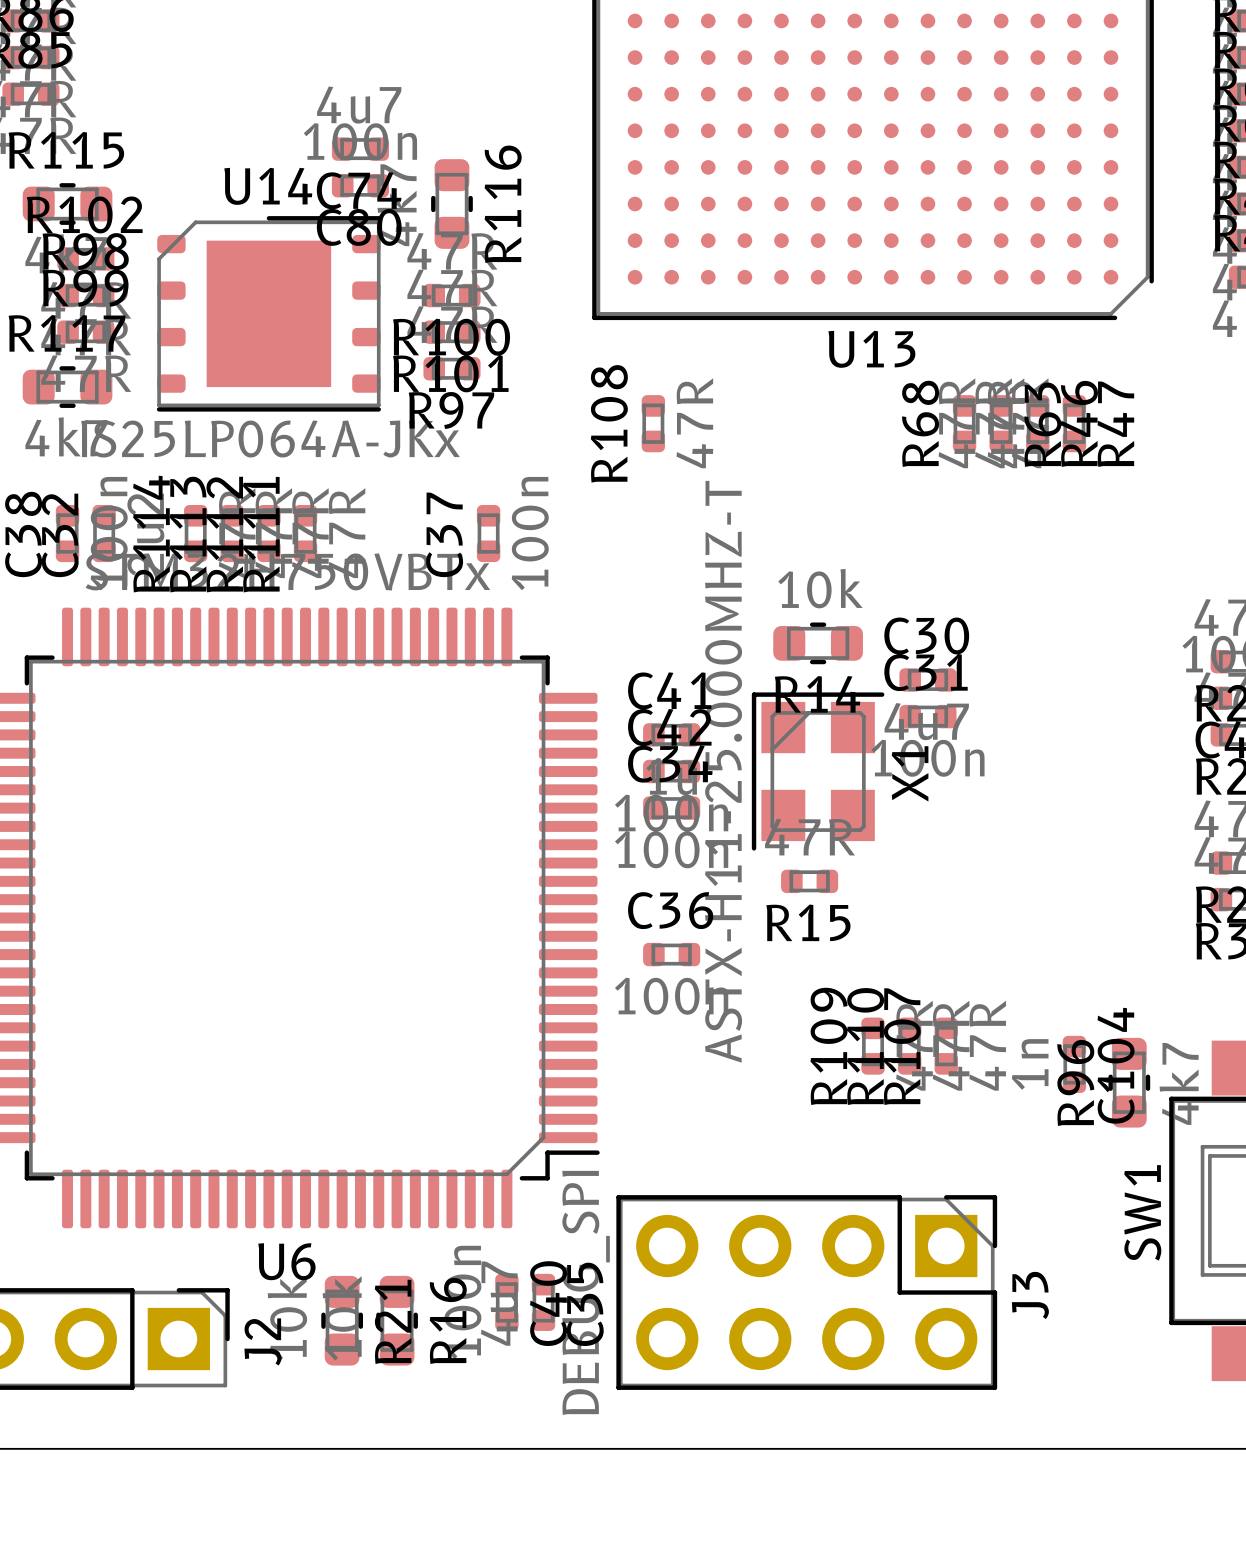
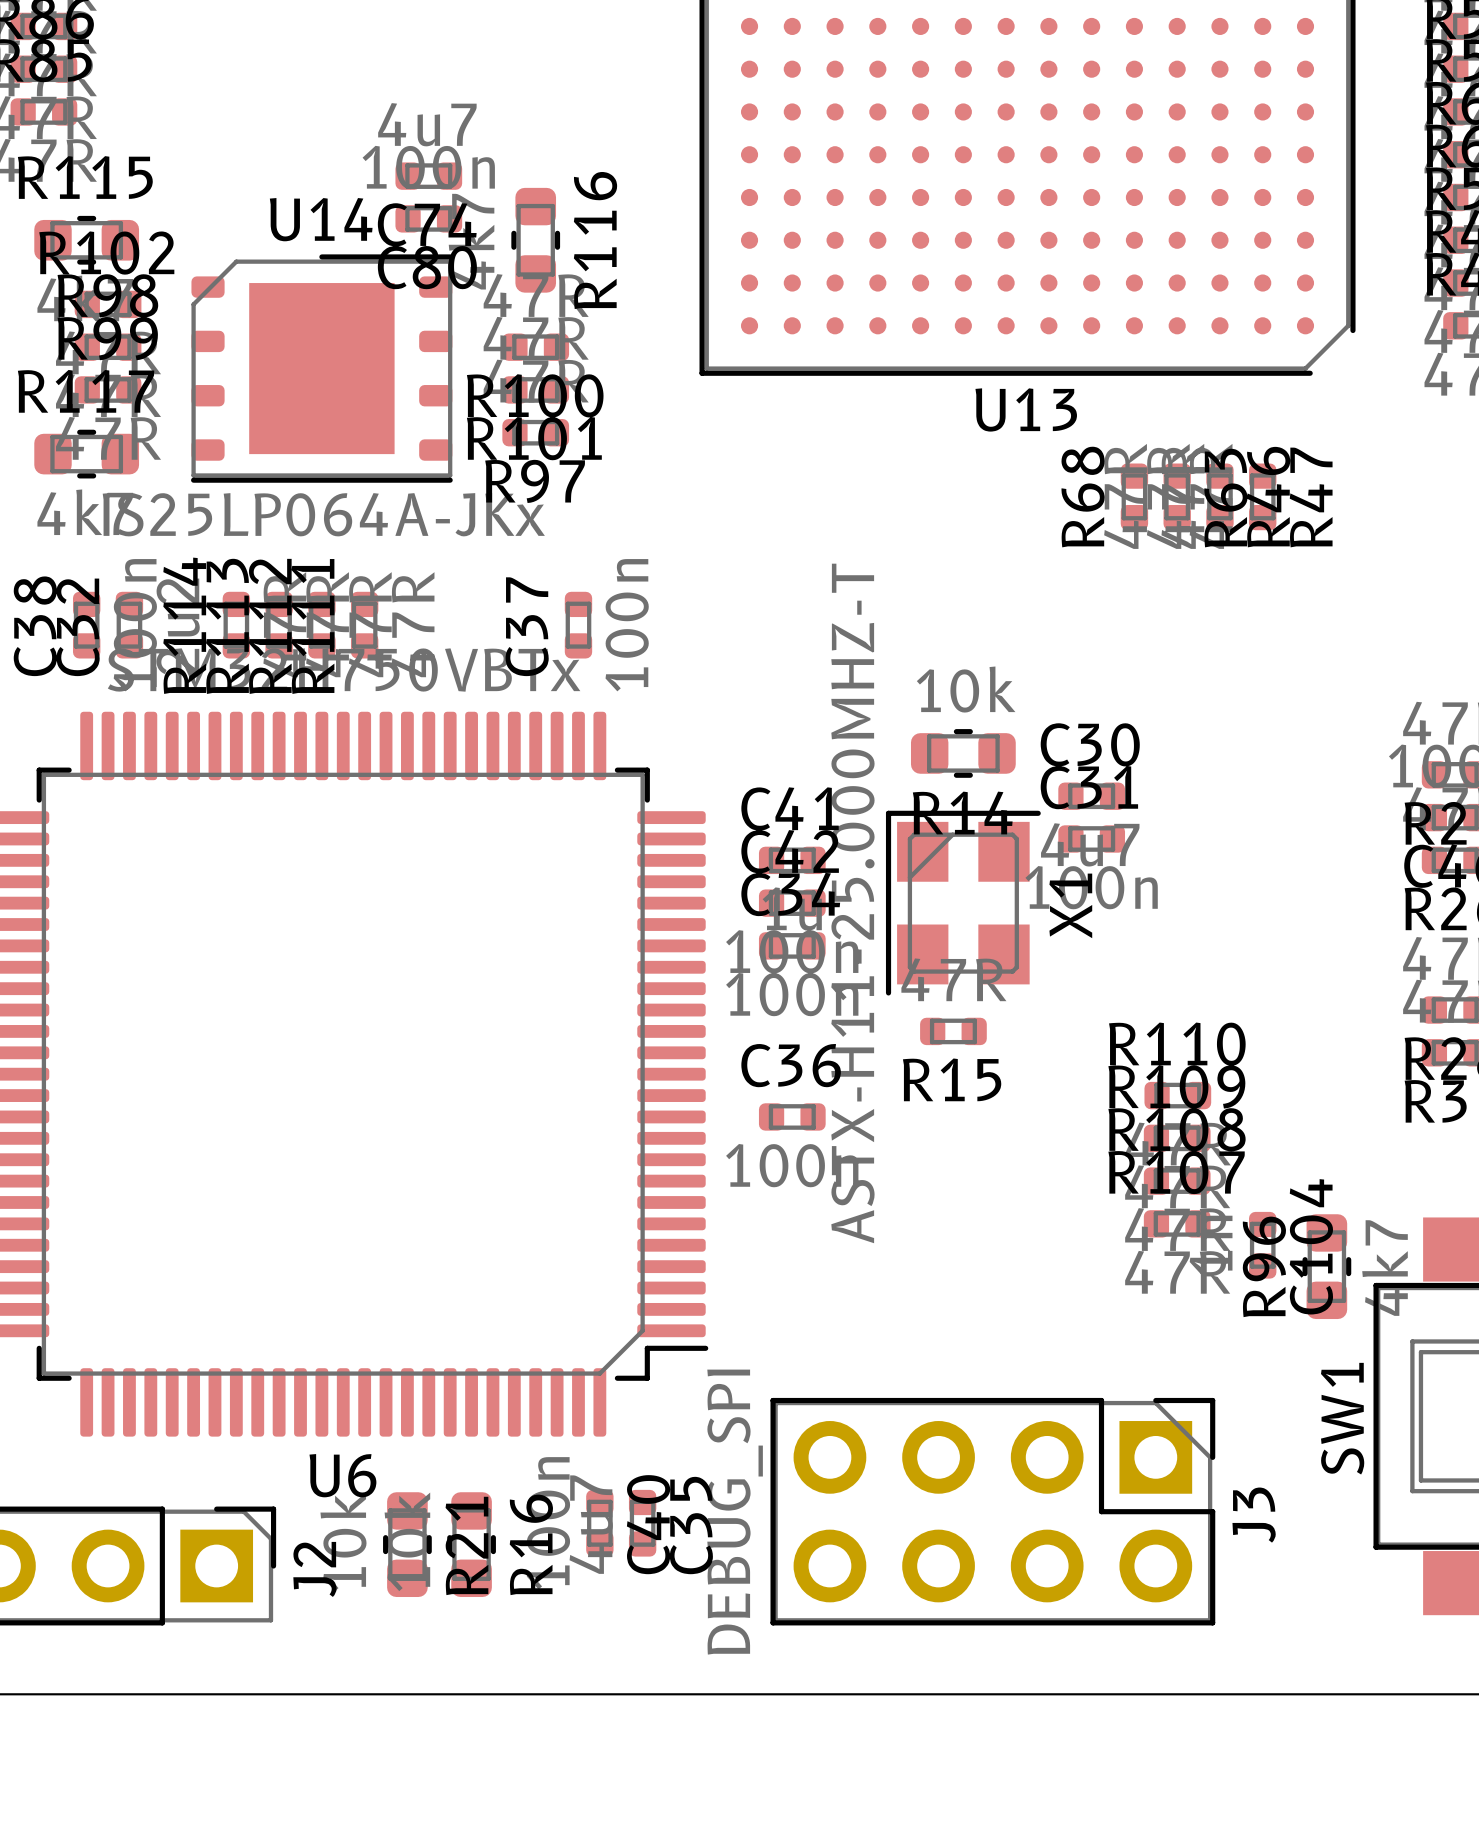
R108 rotation: 0° (653, 423) -> 90° clockwise (1177, 1181)
R108 position: (653, 423) -> (1177, 1181)
R109 rotation: 0° (873, 1046) -> 90° clockwise (1177, 1138)
R109 position: (873, 1046) -> (1177, 1138)
R110 rotation: 0° (909, 1046) -> 90° clockwise (1177, 1095)
R110 position: (909, 1046) -> (1177, 1095)
R107 rotation: 0° (946, 1046) -> 90° clockwise (1177, 1223)
R107 position: (946, 1046) -> (1177, 1223)
J3 position: (806, 1292) -> (992, 1511)

